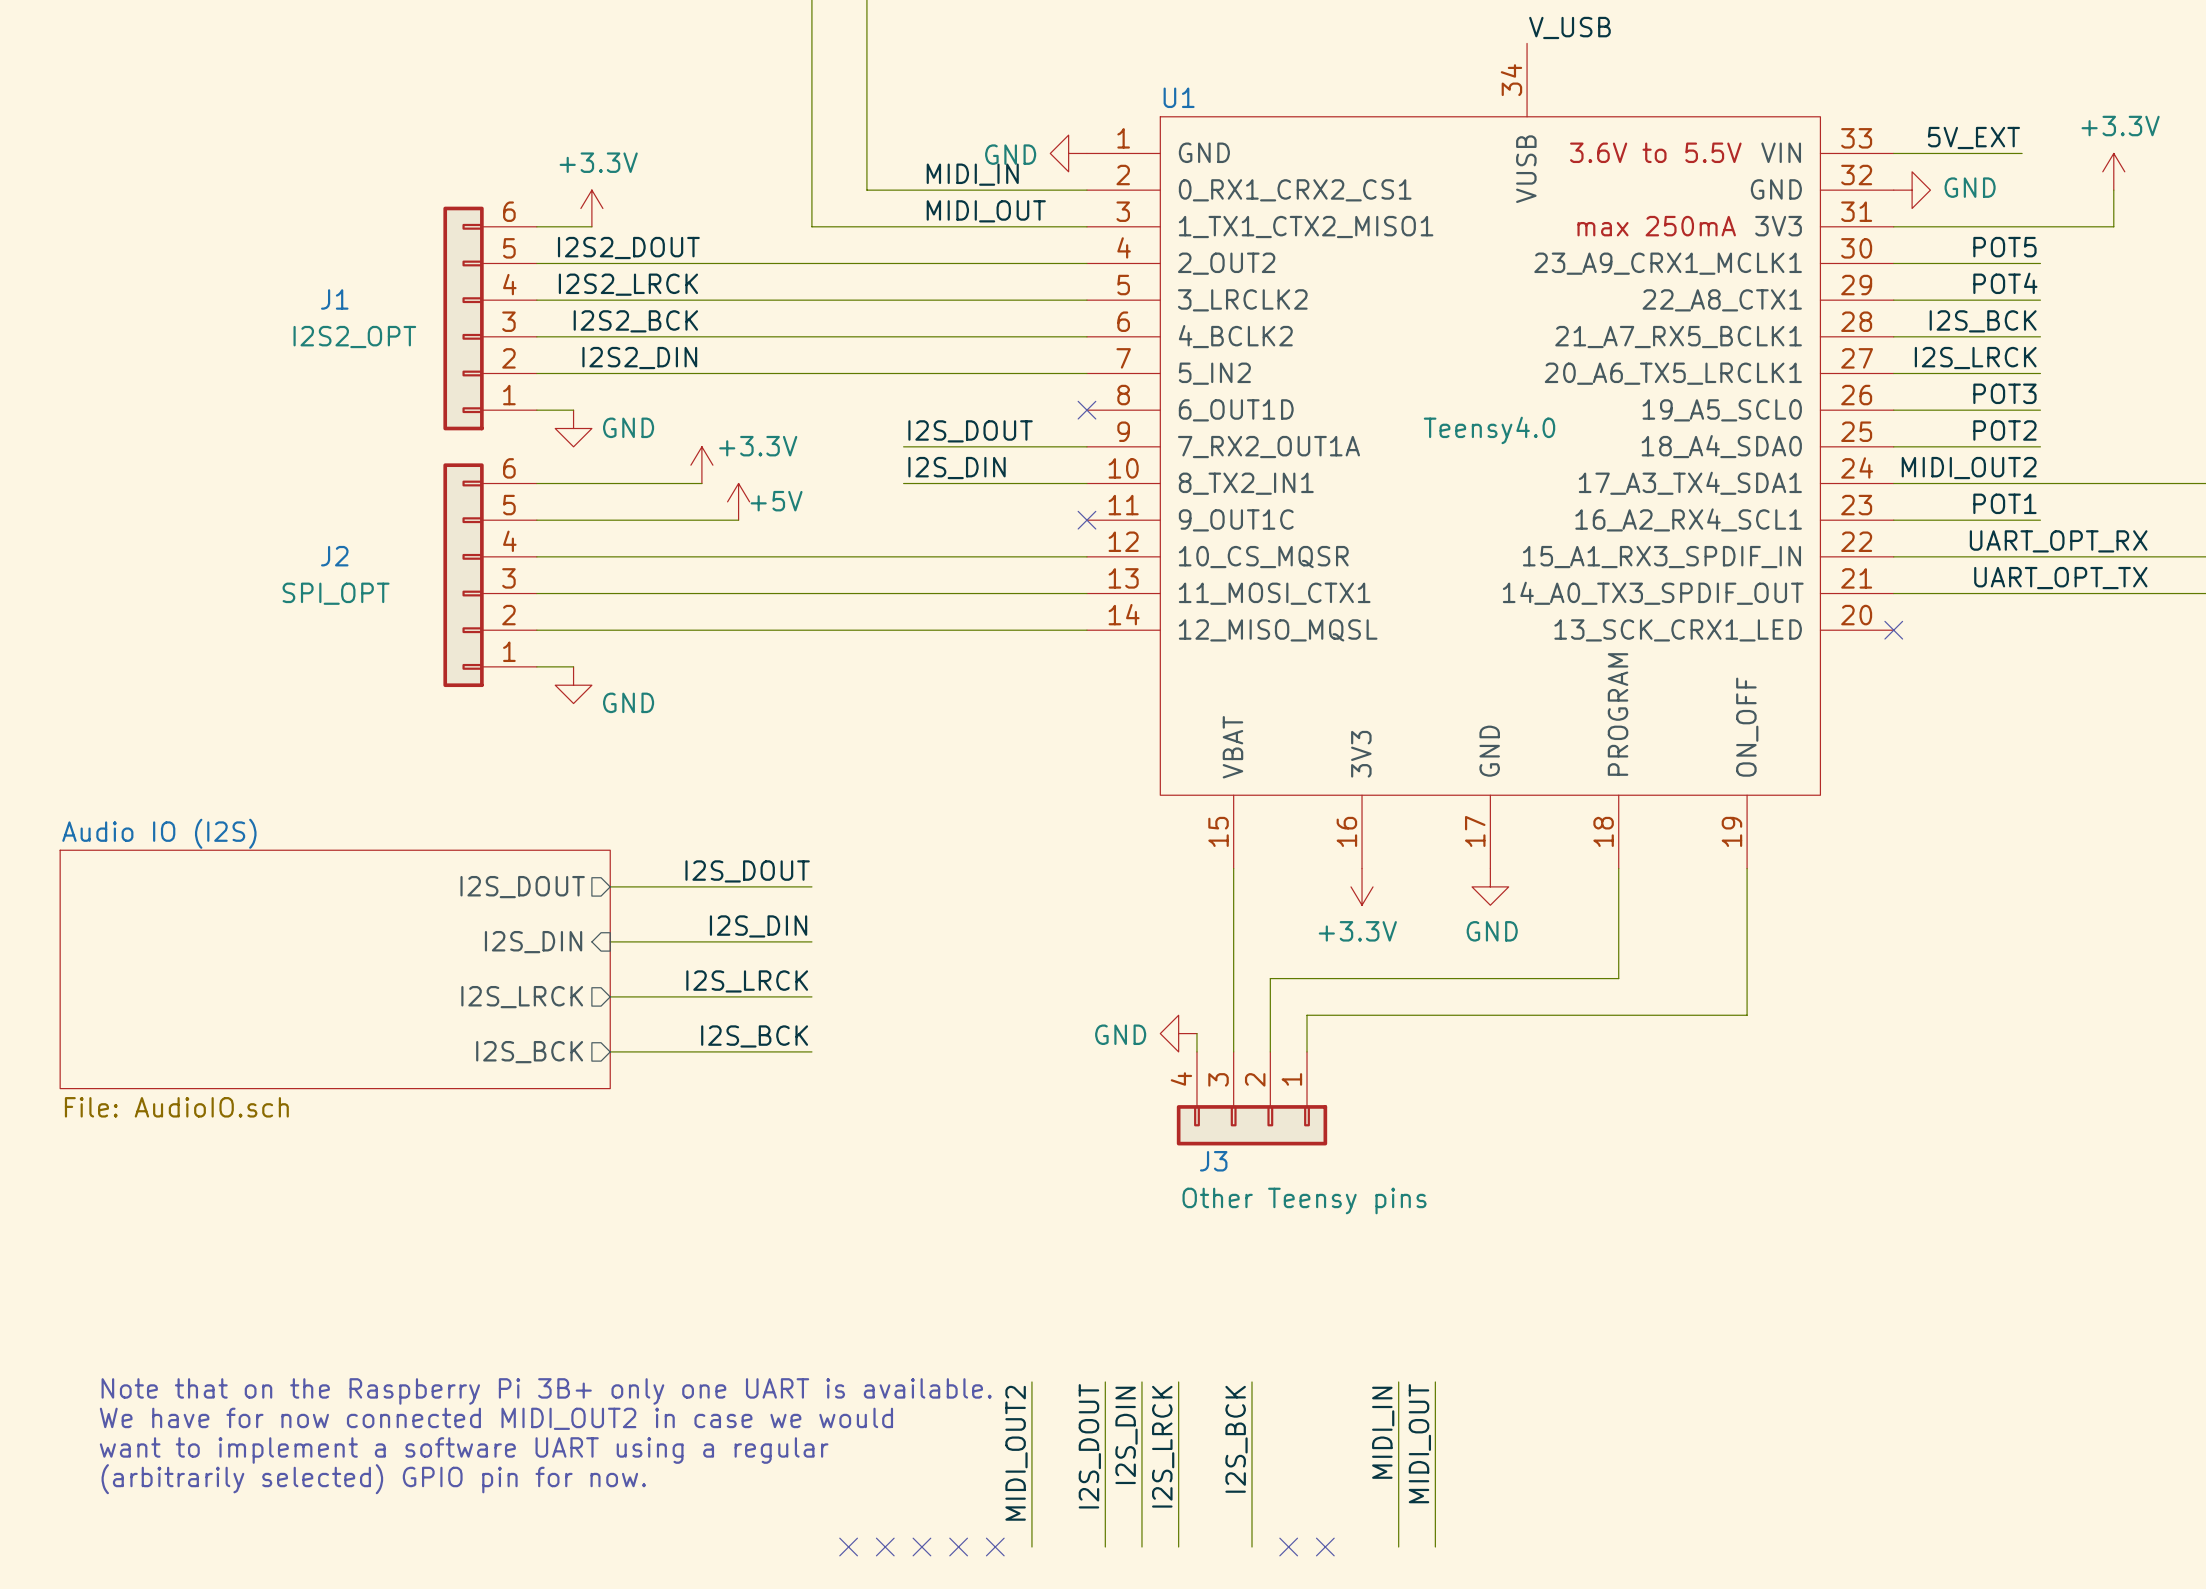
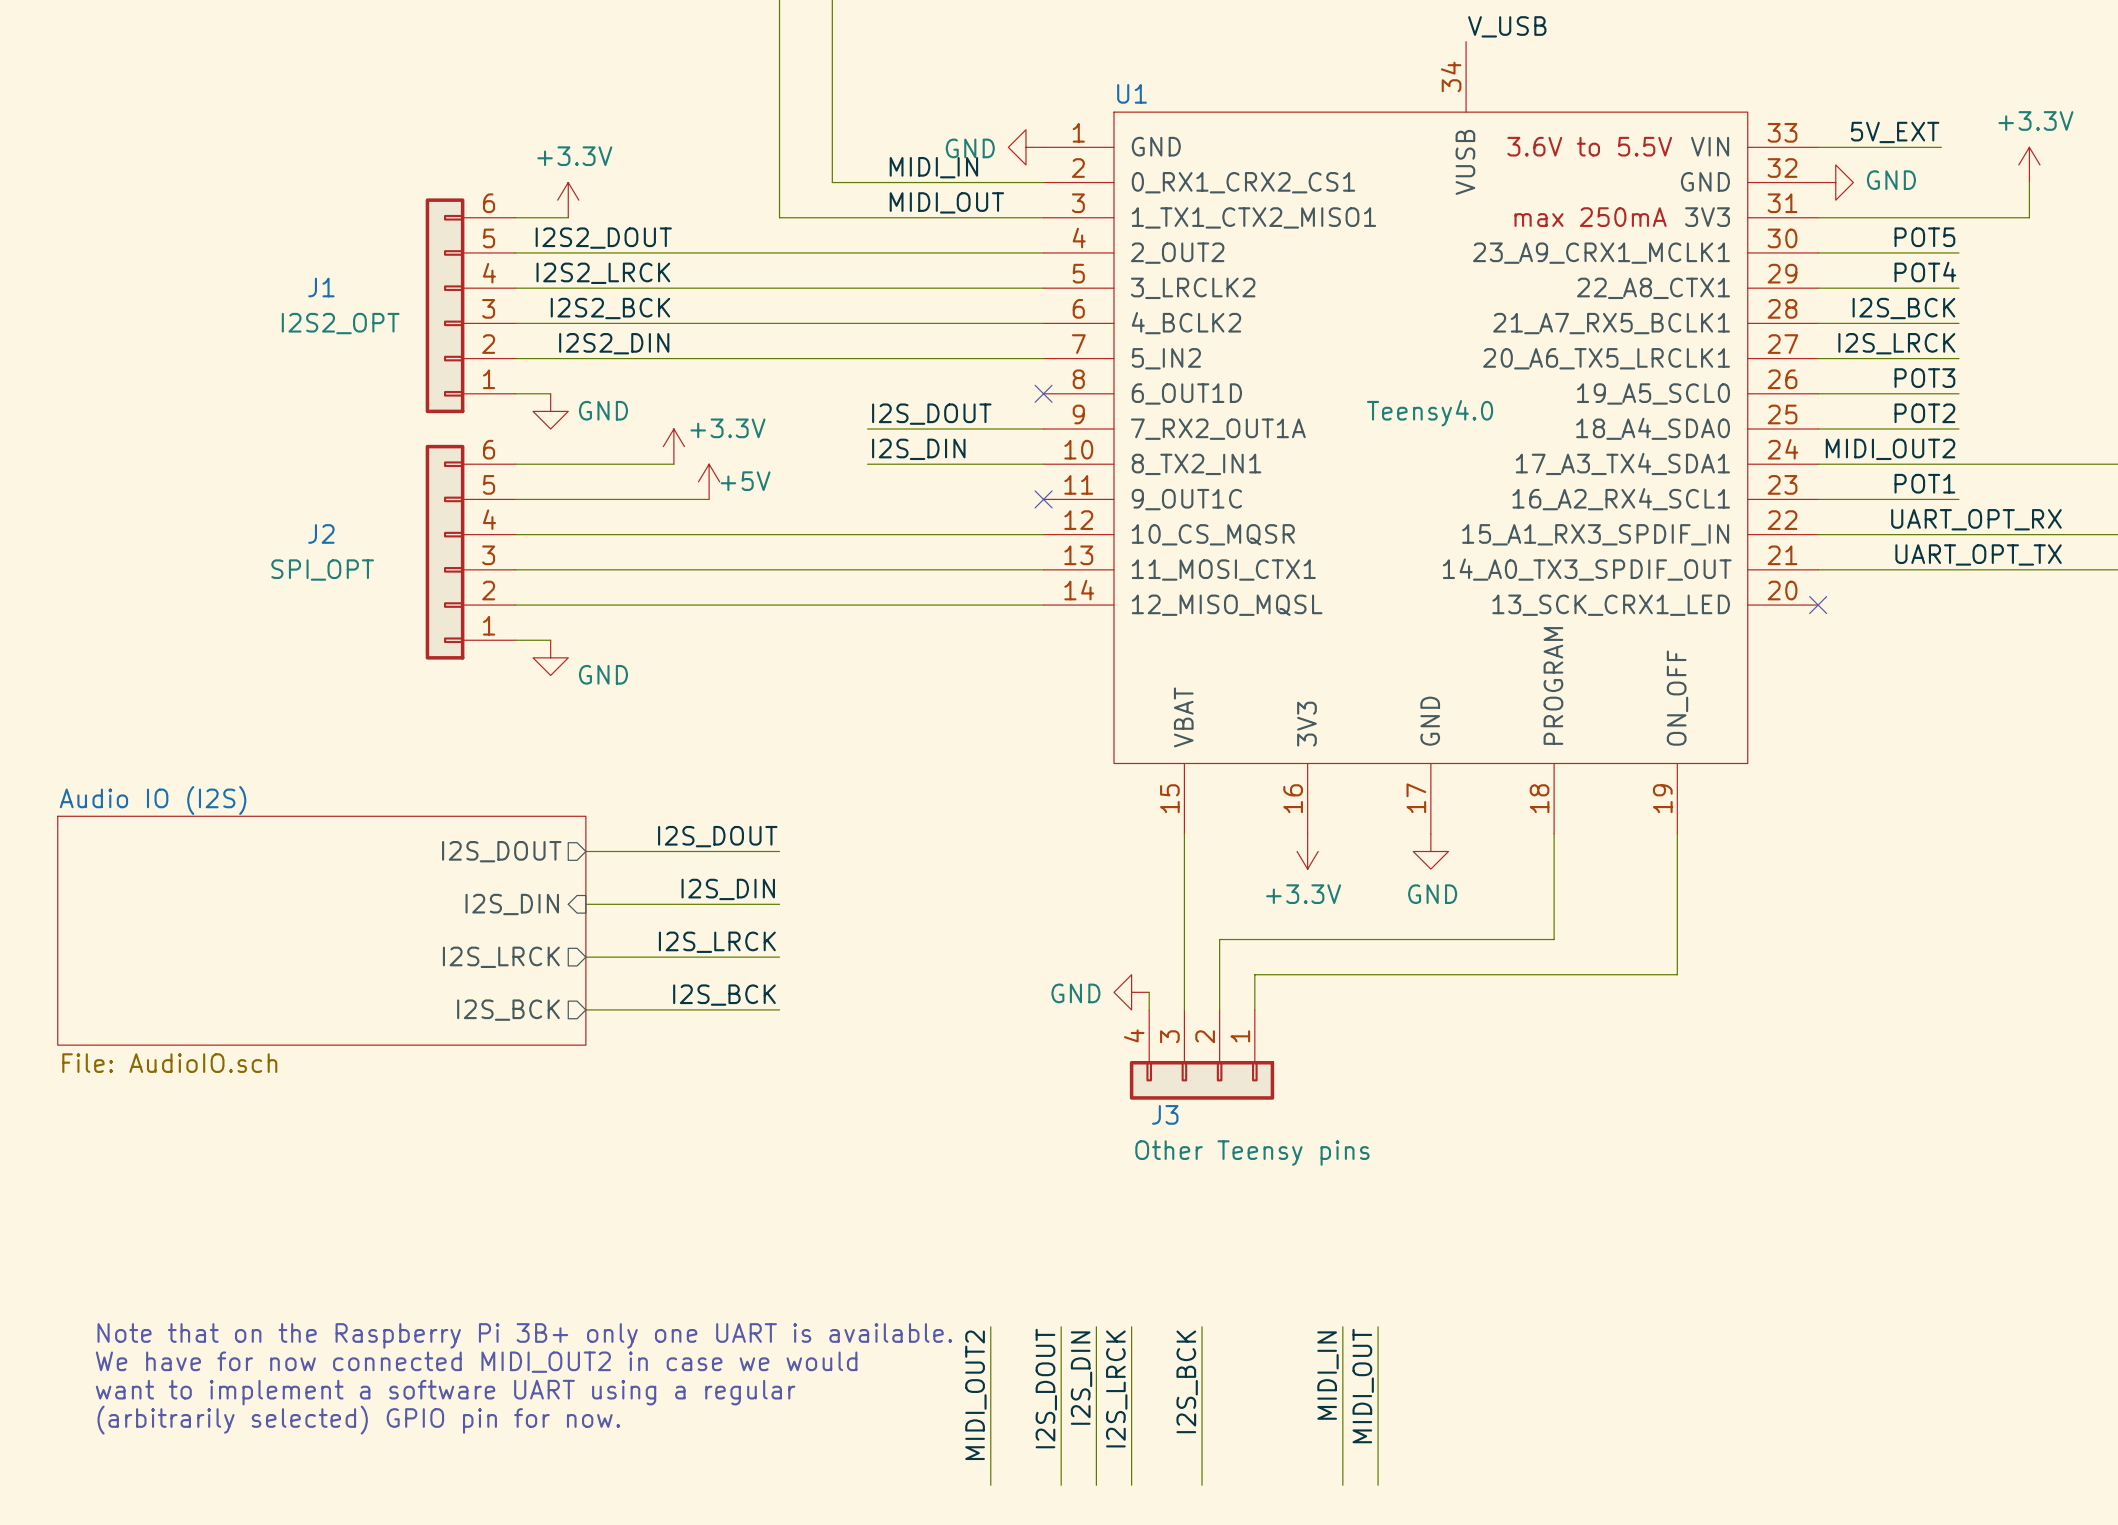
no-connect mark: (848, 1547) -> none
no-connect mark: (885, 1547) -> none
no-connect mark: (921, 1547) -> none
no-connect mark: (958, 1547) -> none
no-connect mark: (995, 1547) -> none
no-connect mark: (1288, 1547) -> none
no-connect mark: (1325, 1547) -> none

